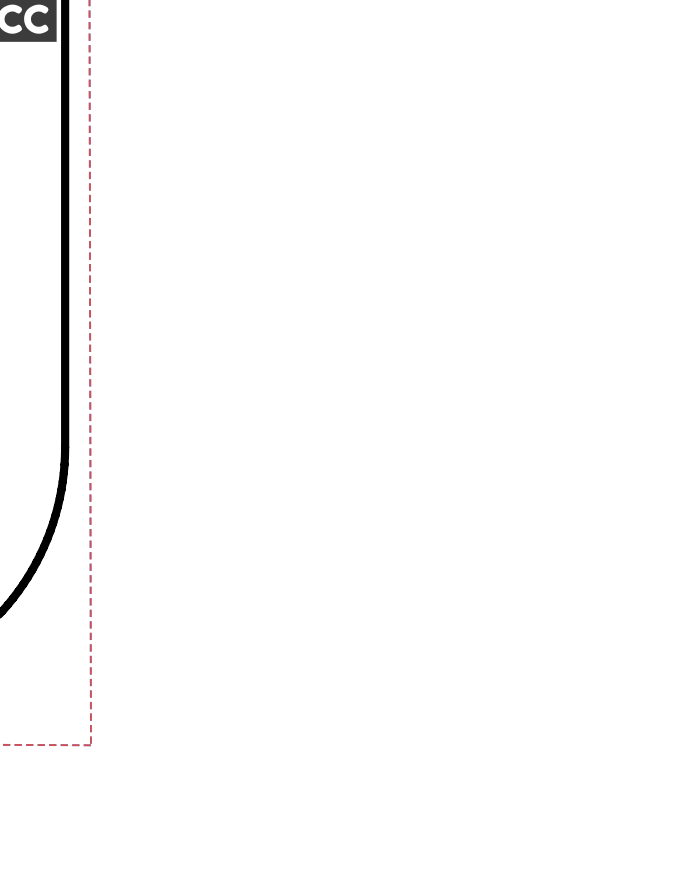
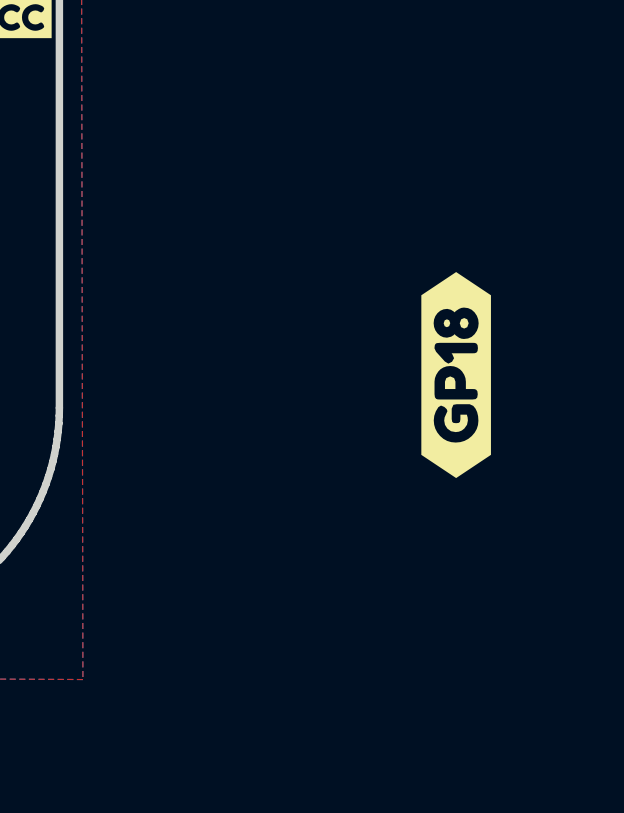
drawing: none -> [421, 272, 491, 479]

